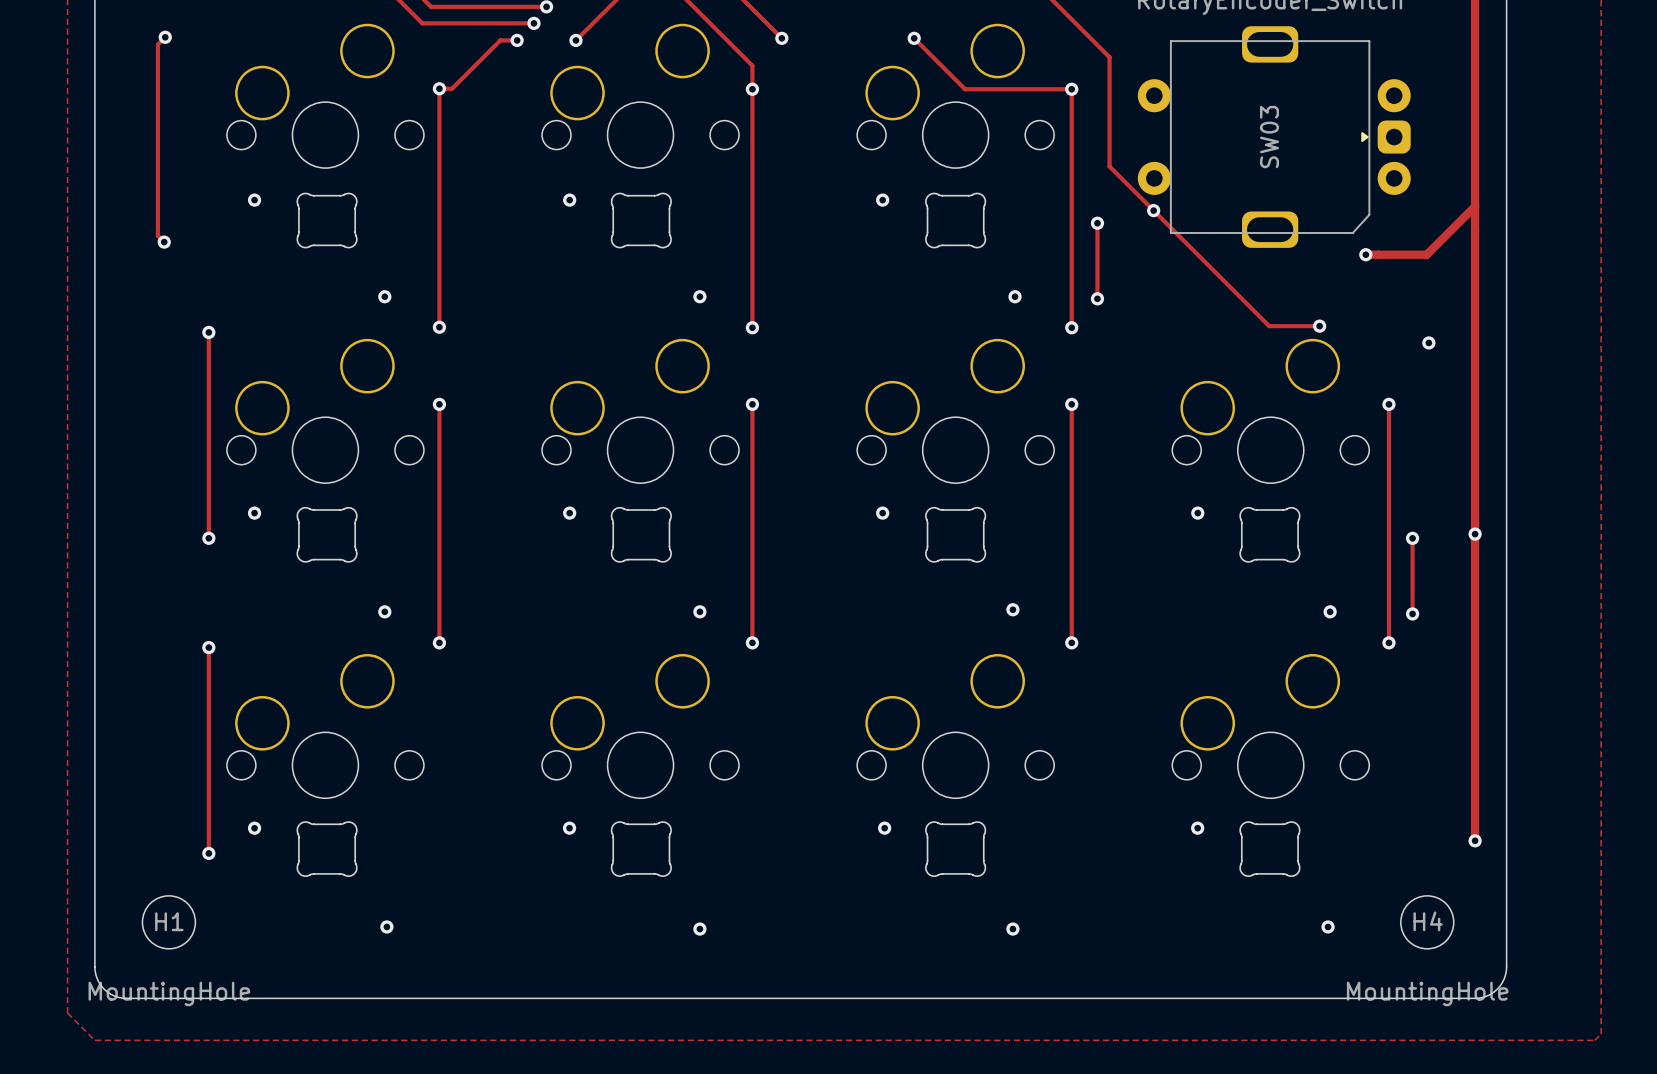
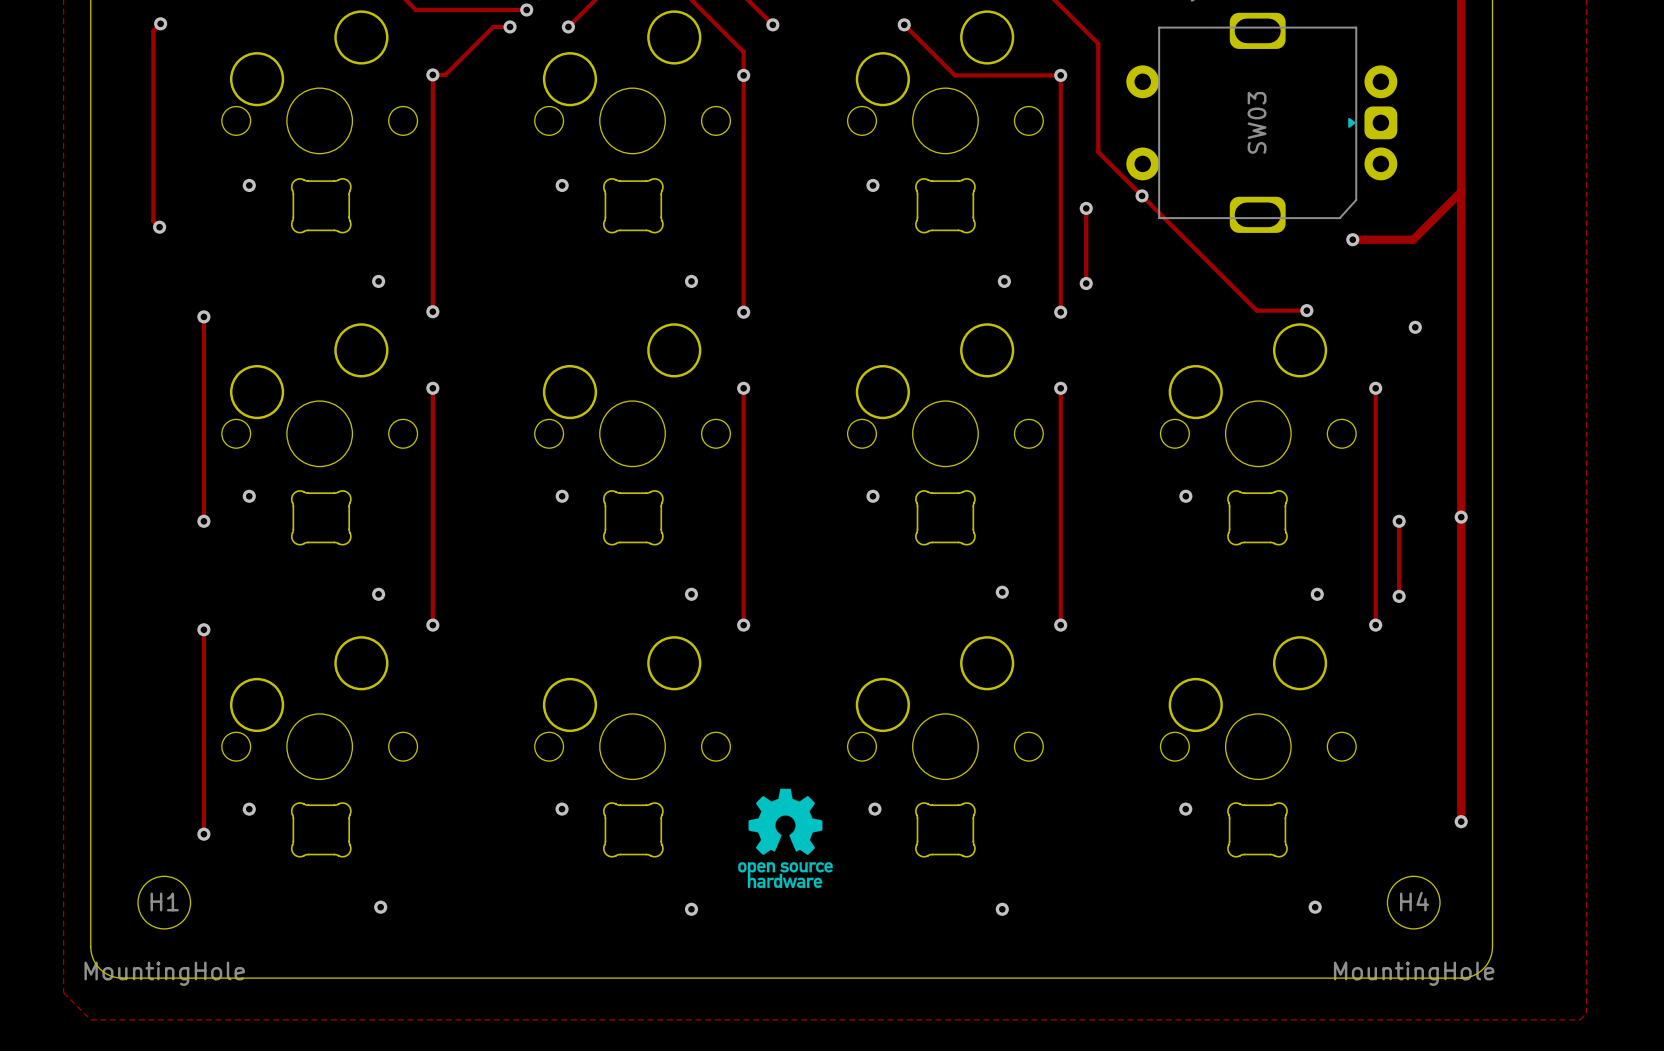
drawing: none -> [738, 788, 833, 889]

